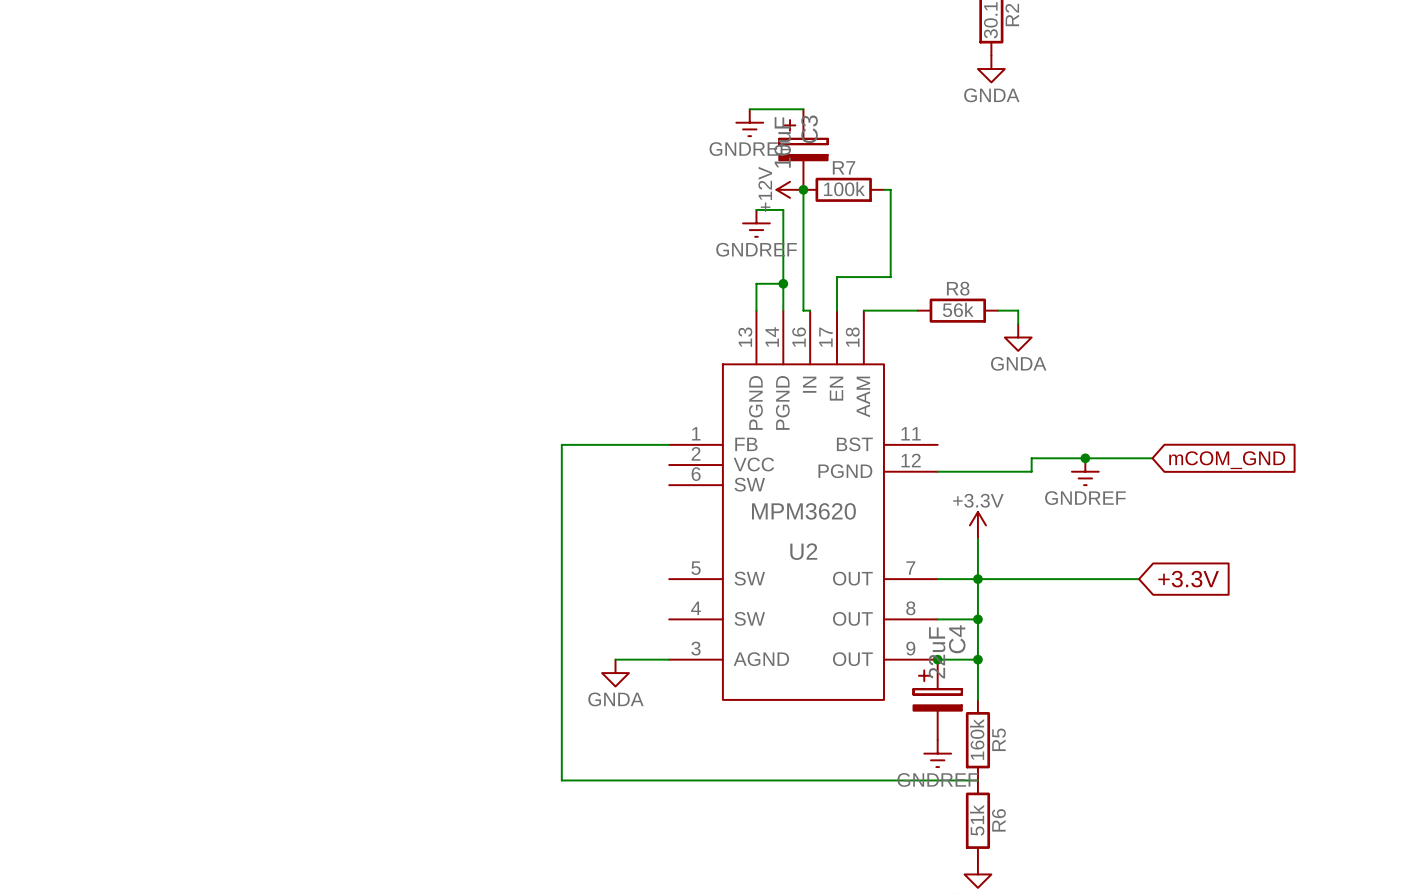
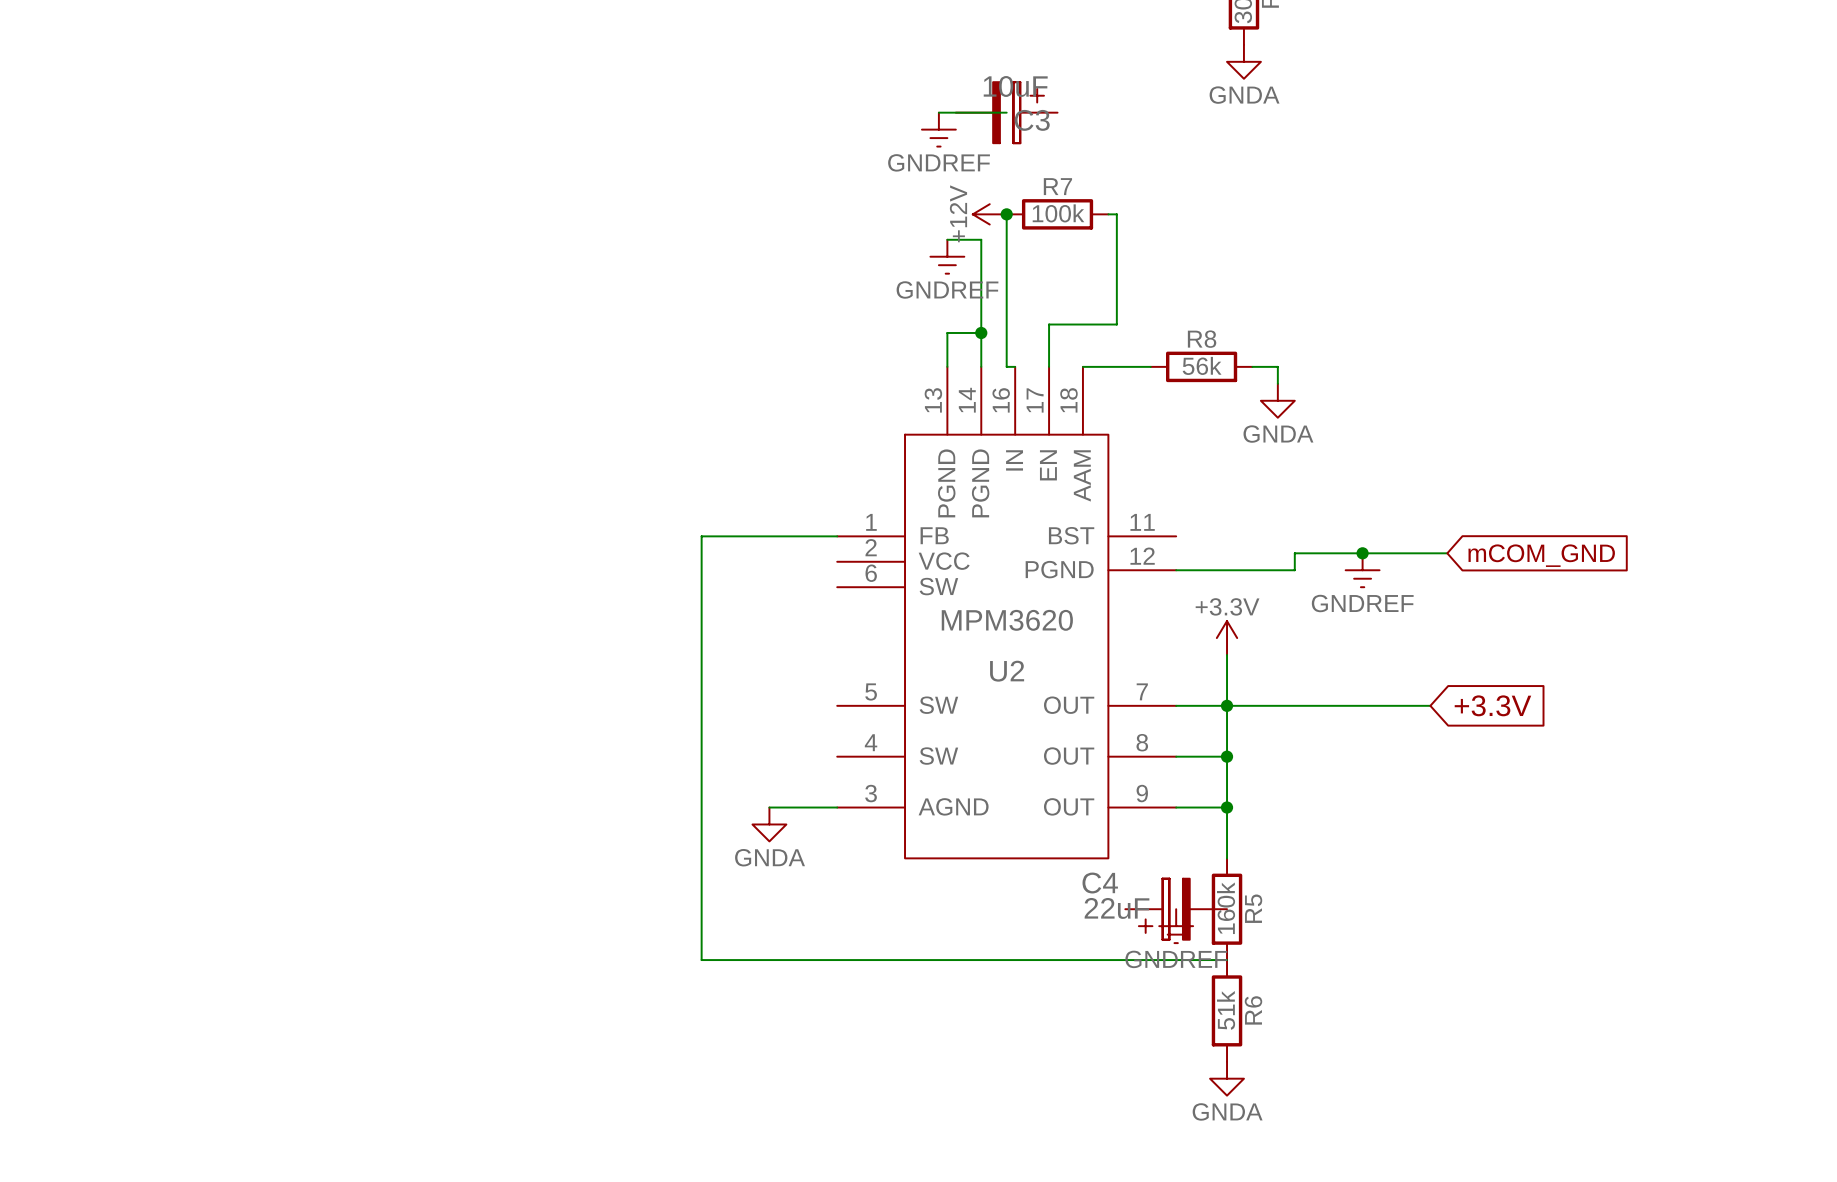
C3 rotation: 0° (803, 140) -> 90° clockwise (1018, 112)
junction: (937, 659) -> none
C4 rotation: 0° (937, 690) -> 90° counterclockwise (1164, 909)

